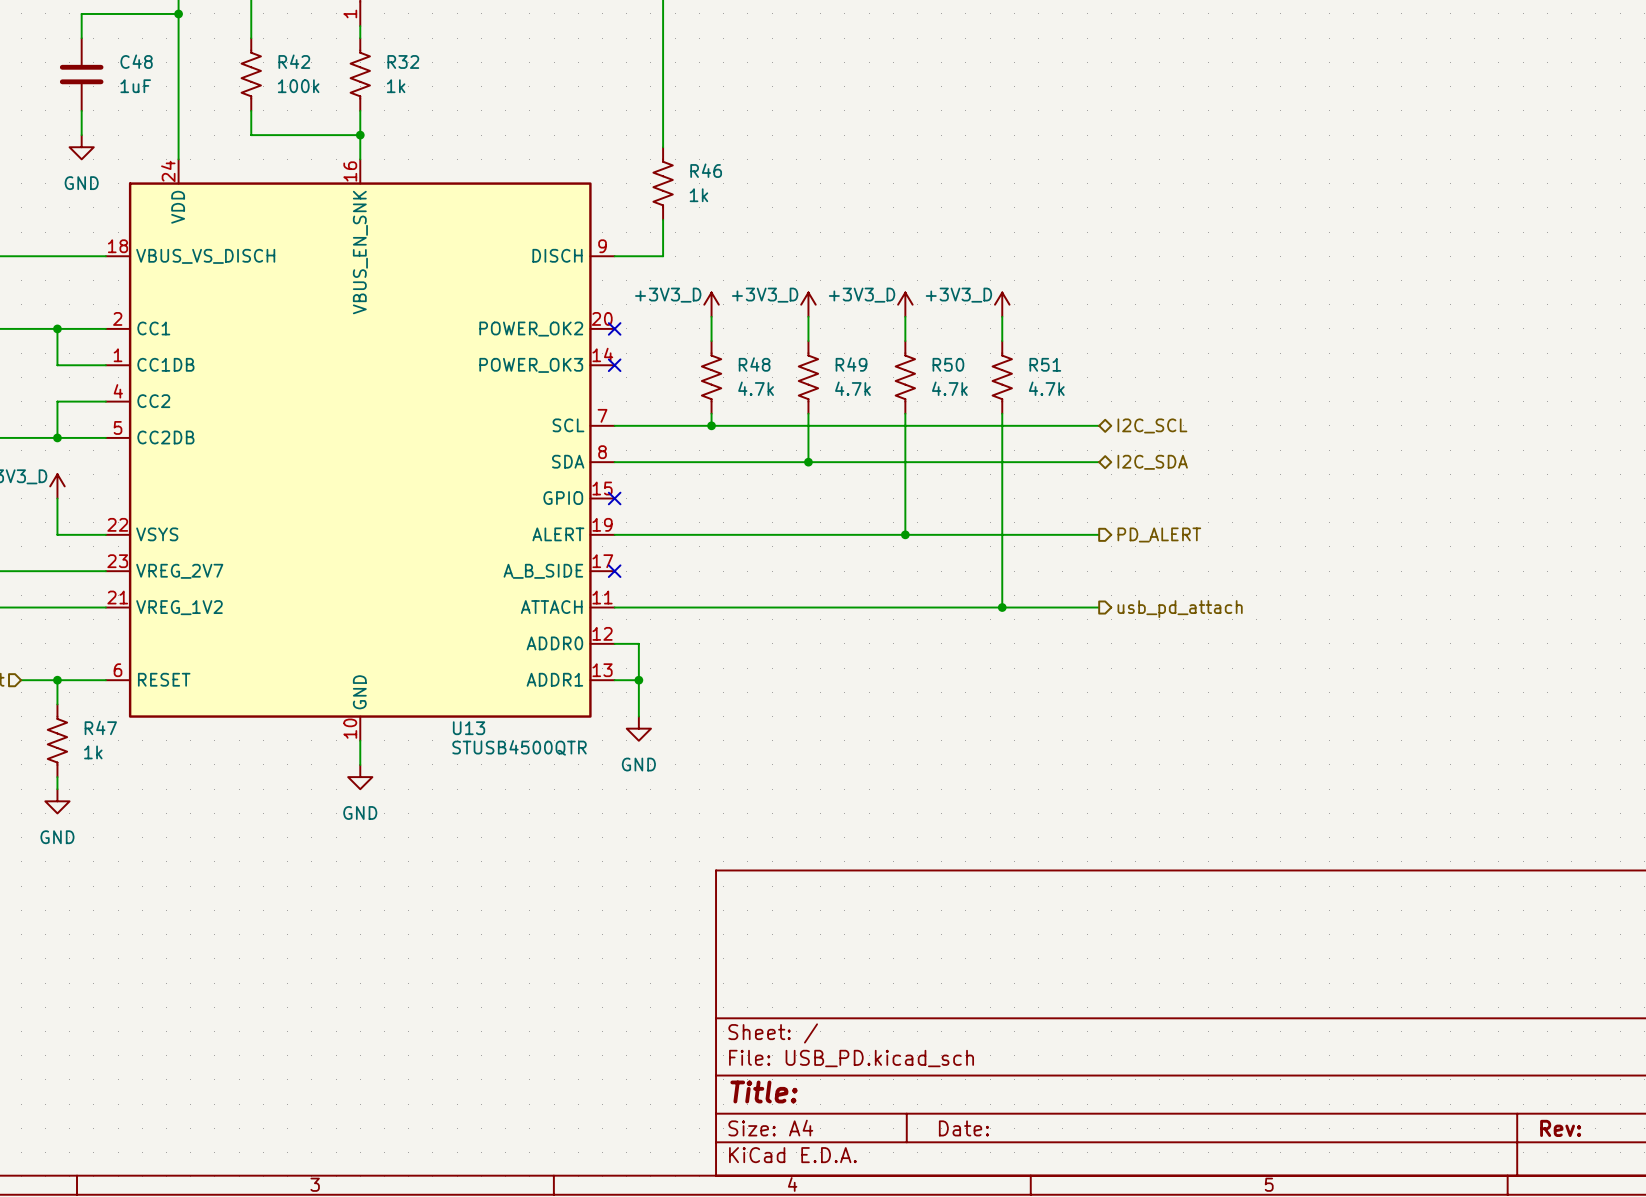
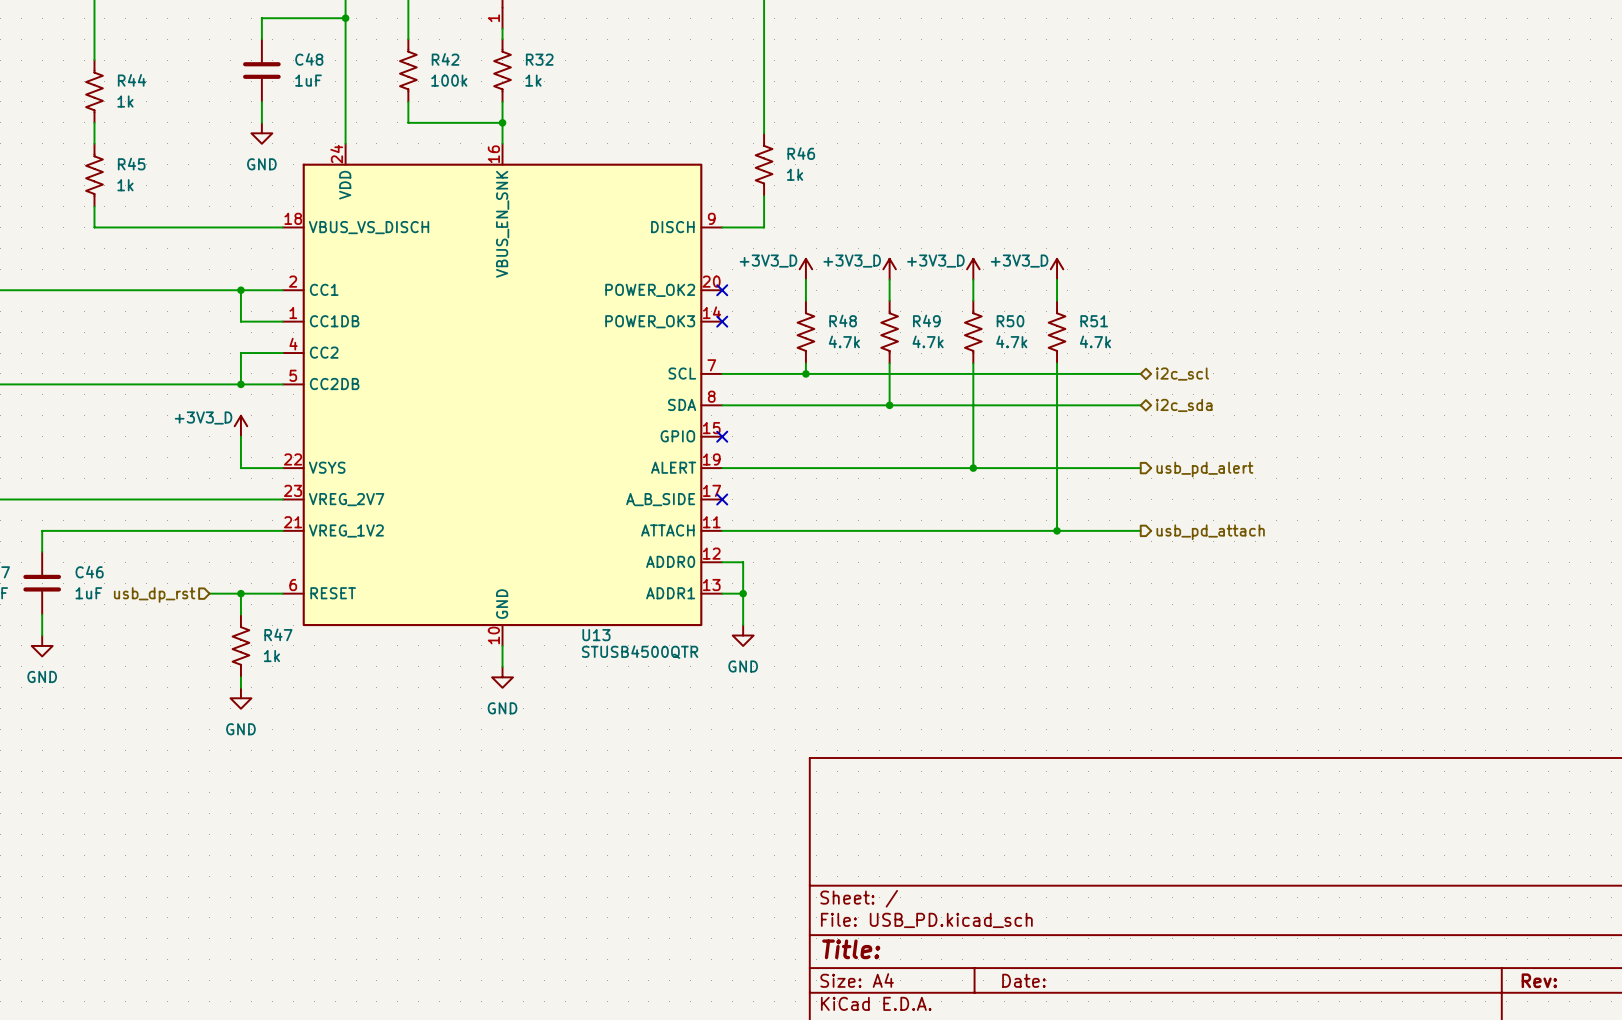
hierarchical label: I2C_SCL (1152, 425) -> i2c_scl (1182, 374)
hierarchical label: I2C_SDA (1152, 462) -> i2c_sda (1184, 405)
hierarchical label: PD_ALERT (1159, 534) -> usb_pd_alert (1204, 469)

